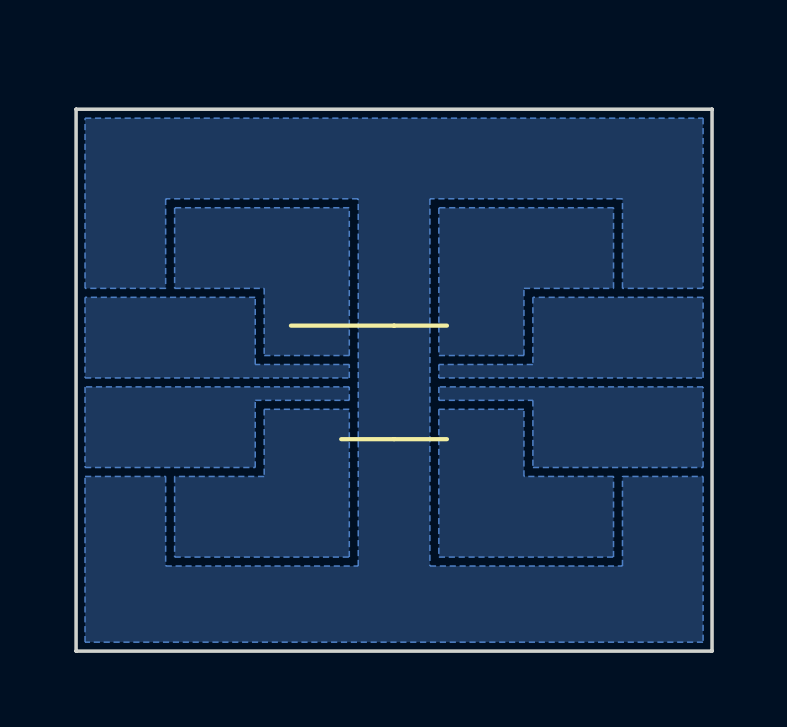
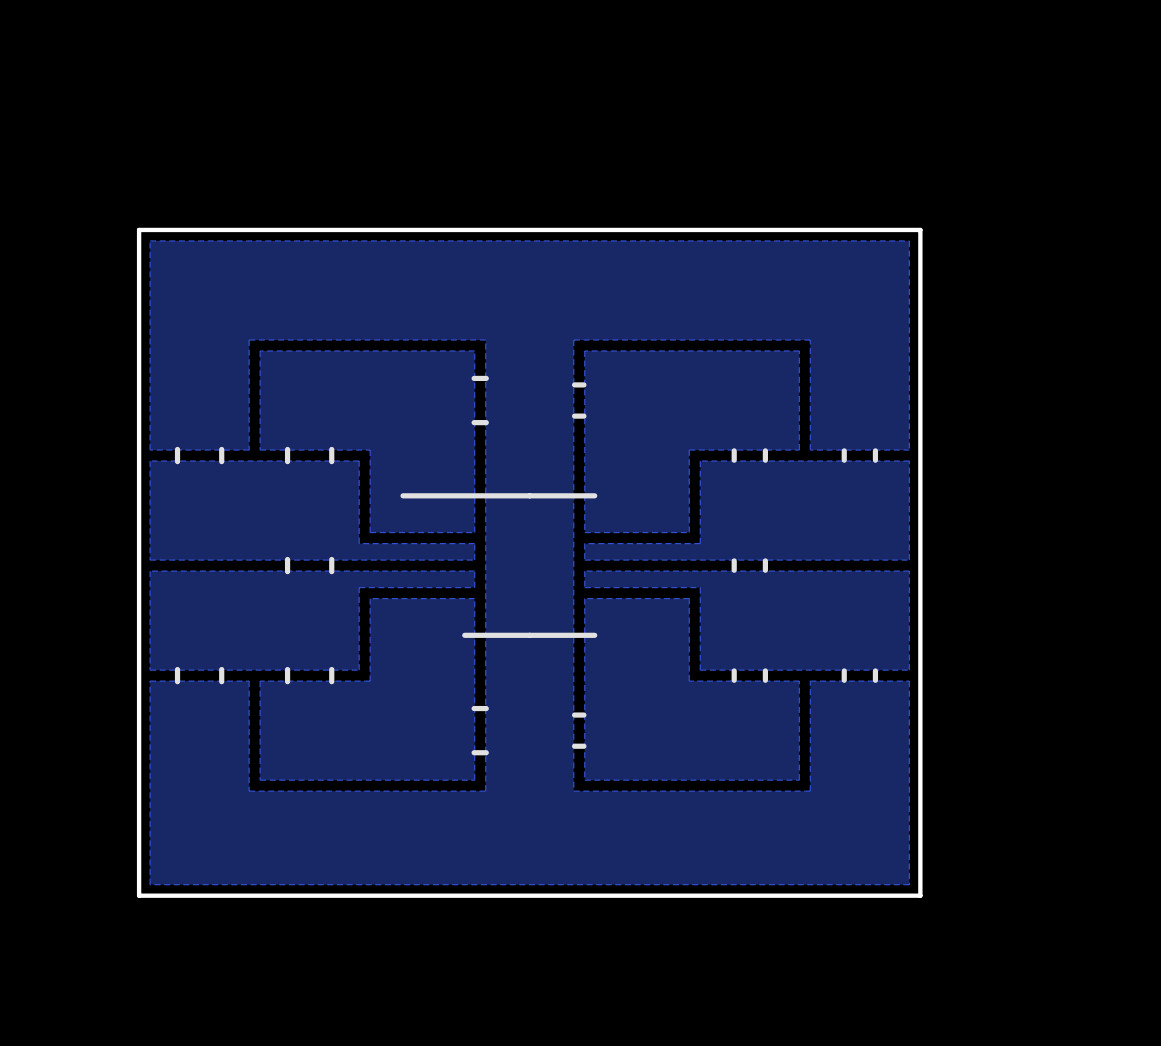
drawing: none -> [471, 375, 489, 426]
drawing: none -> [571, 382, 587, 419]
drawing: none -> [174, 446, 225, 465]
drawing: none -> [284, 446, 335, 465]
drawing: none -> [731, 448, 769, 463]
drawing: none -> [841, 448, 879, 463]
drawing: none -> [284, 556, 335, 575]
drawing: none -> [731, 558, 769, 573]
drawing: none -> [174, 666, 225, 685]
drawing: none -> [284, 666, 335, 685]
drawing: none -> [731, 668, 769, 683]
drawing: none -> [841, 668, 879, 683]
drawing: none -> [471, 705, 489, 756]
drawing: none -> [571, 712, 587, 749]

